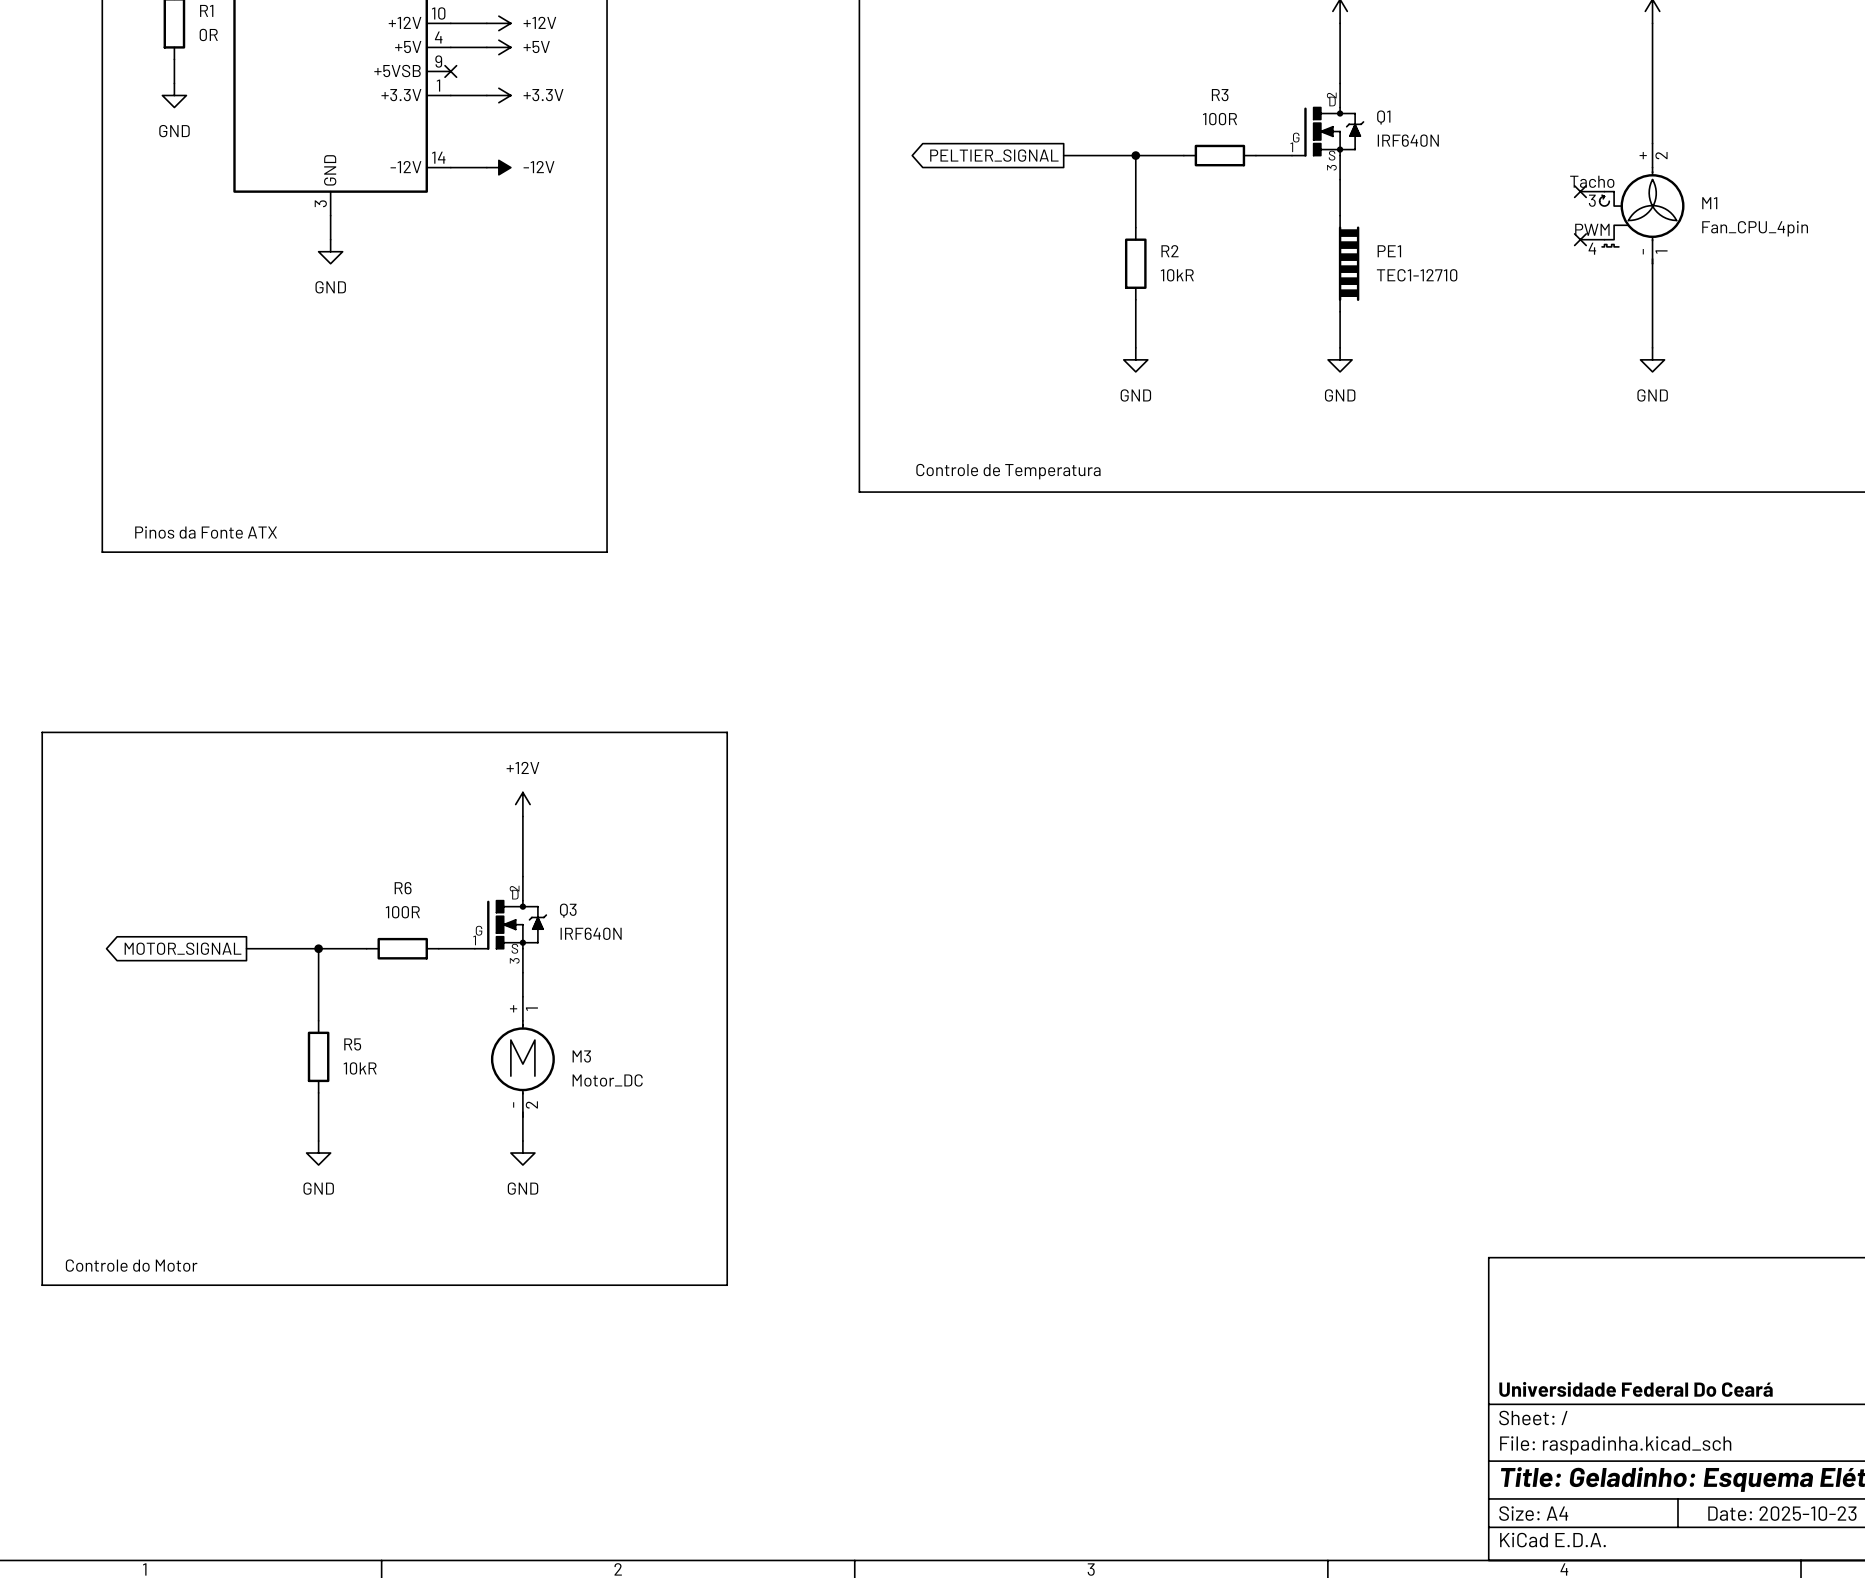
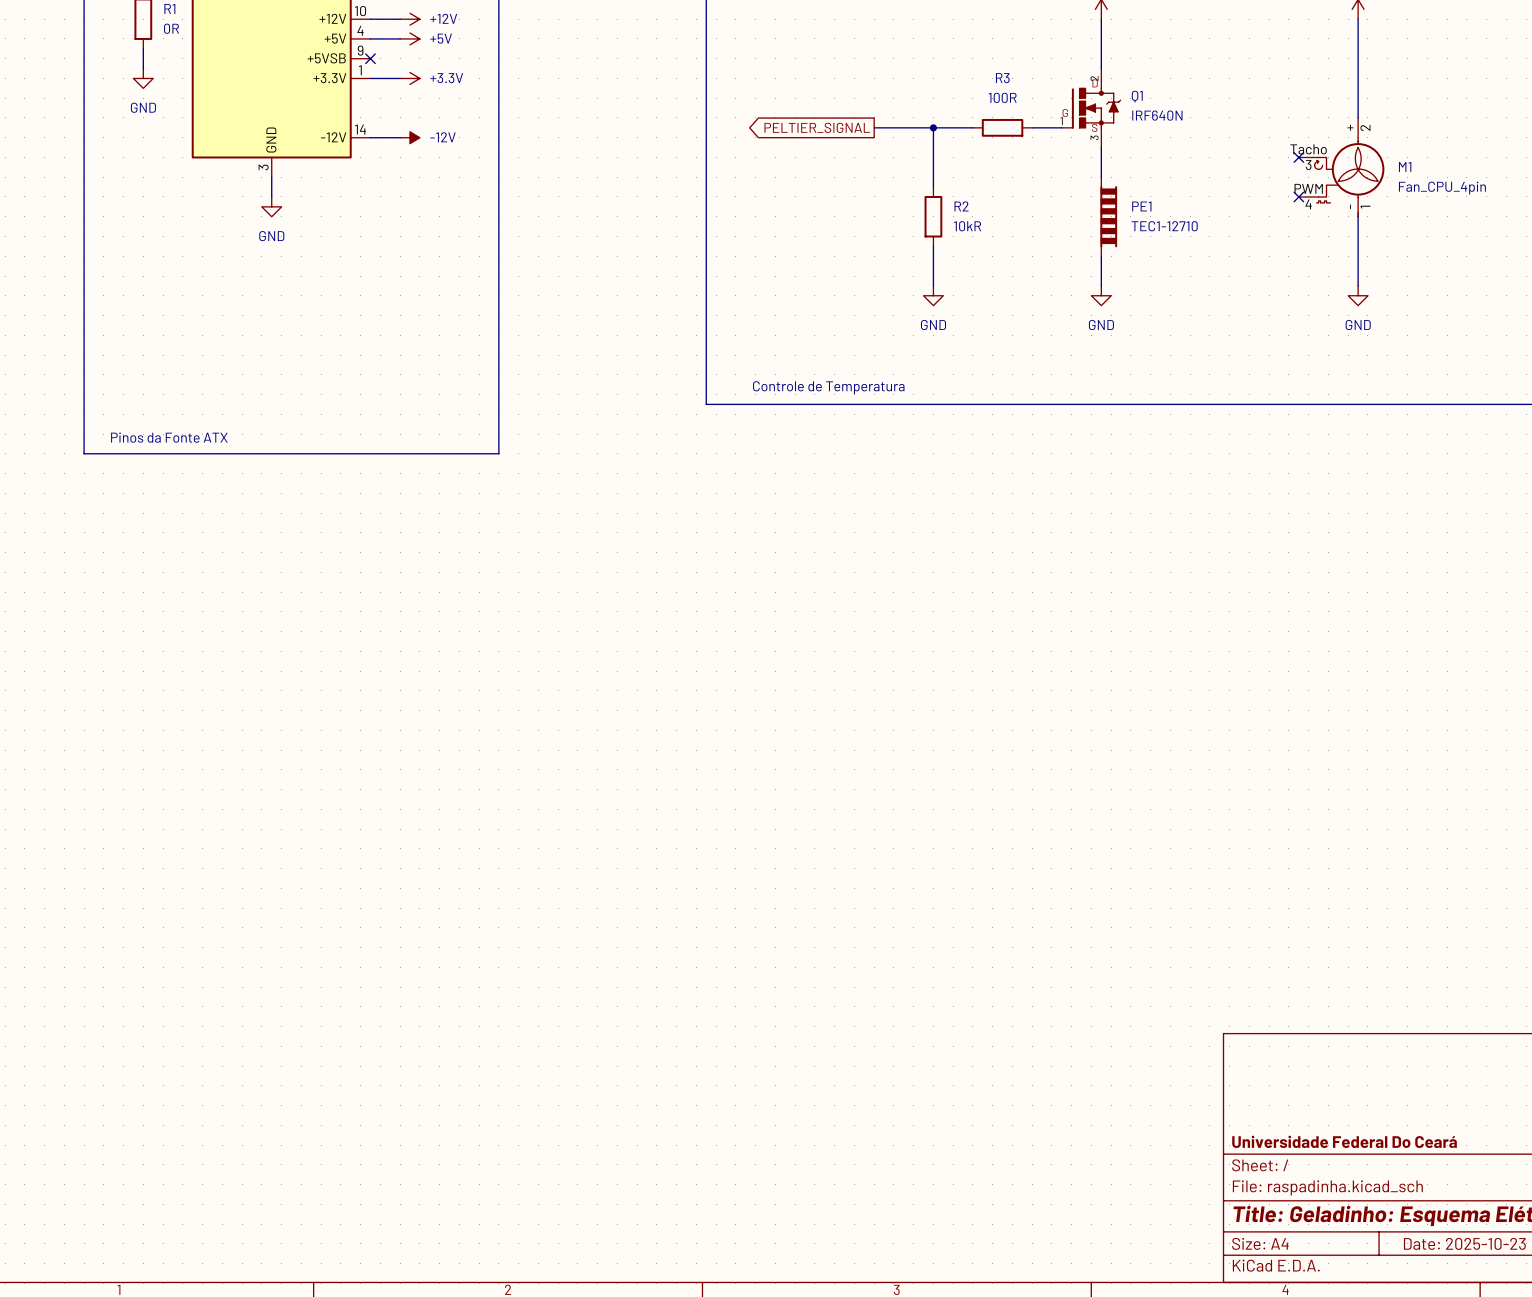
line: (42, 732) (727, 732) (727, 1285) (42, 1285) (42, 732) -> none
power symbol: +12V (522, 804) -> none
wire: (522, 816) (522, 876) -> none
Q3: IRF640N (510, 924) -> none
global label: MOTOR_SIGNAL (183, 948) -> none
wire: (246, 948) (366, 948) -> none
wire: (318, 948) (318, 1020) -> none
junction: (318, 948) -> none
R6: 100R (402, 948) -> none
wire: (438, 948) (474, 948) -> none
wire: (522, 972) (522, 996) -> none
R5: 10kR (318, 1056) -> none
M3: Motor_DC (522, 1056) -> none
wire: (318, 1092) (318, 1140) -> none
wire: (522, 1116) (522, 1140) -> none
power symbol: GND (318, 1153) -> none
power symbol: GND (522, 1153) -> none
text: Controle do Motor (131, 1265) -> none

